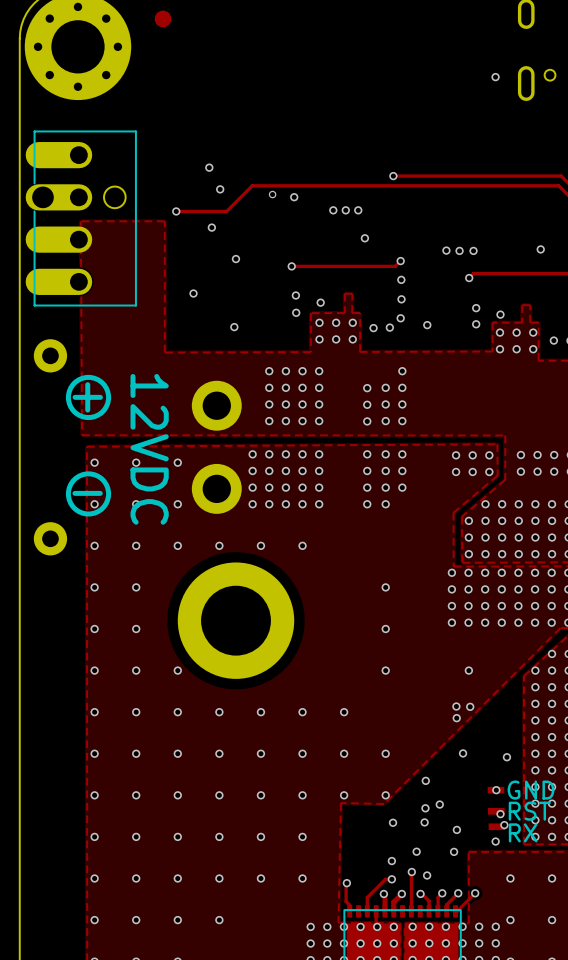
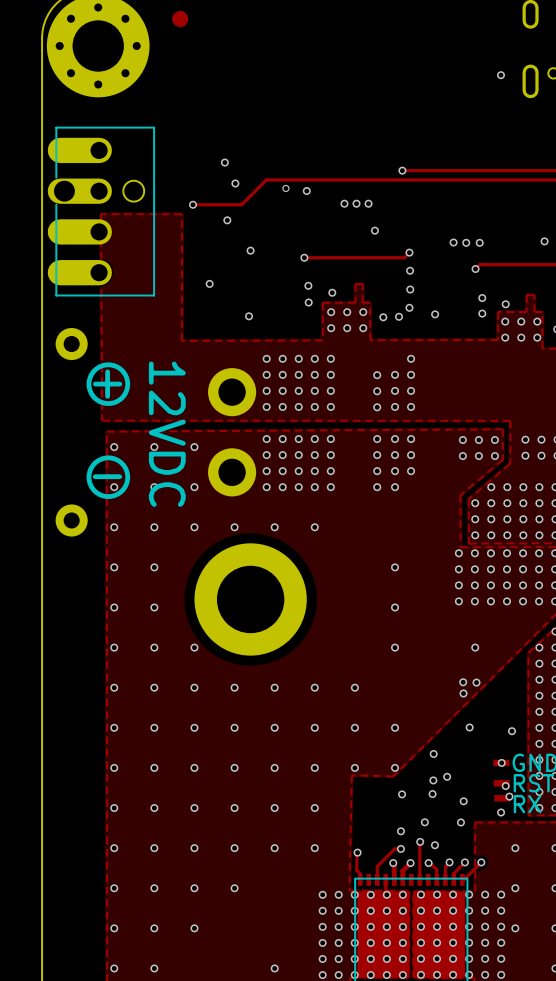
via: none -> (266, 358)
via: none -> (266, 374)
via: none -> (266, 390)
via: none -> (266, 406)

